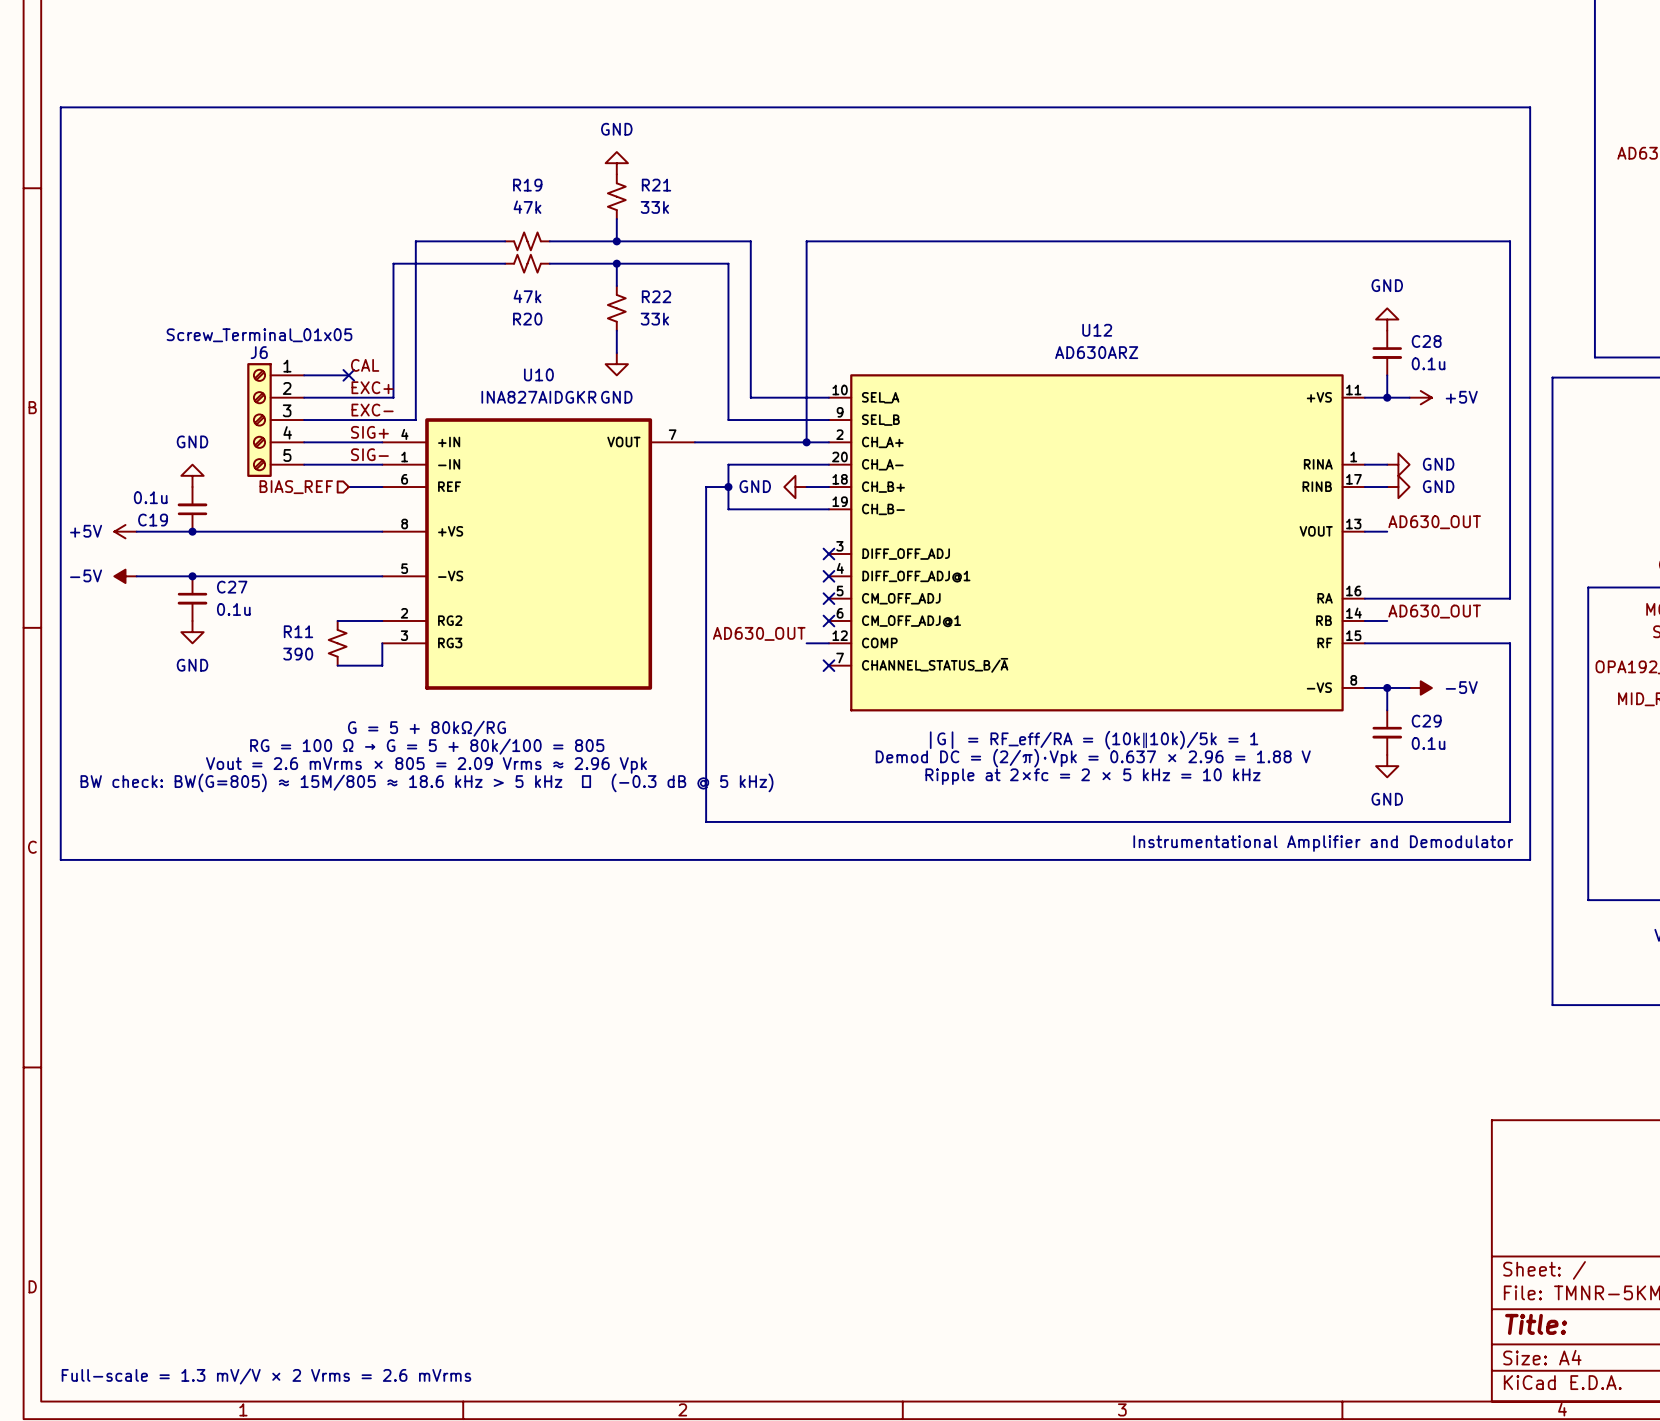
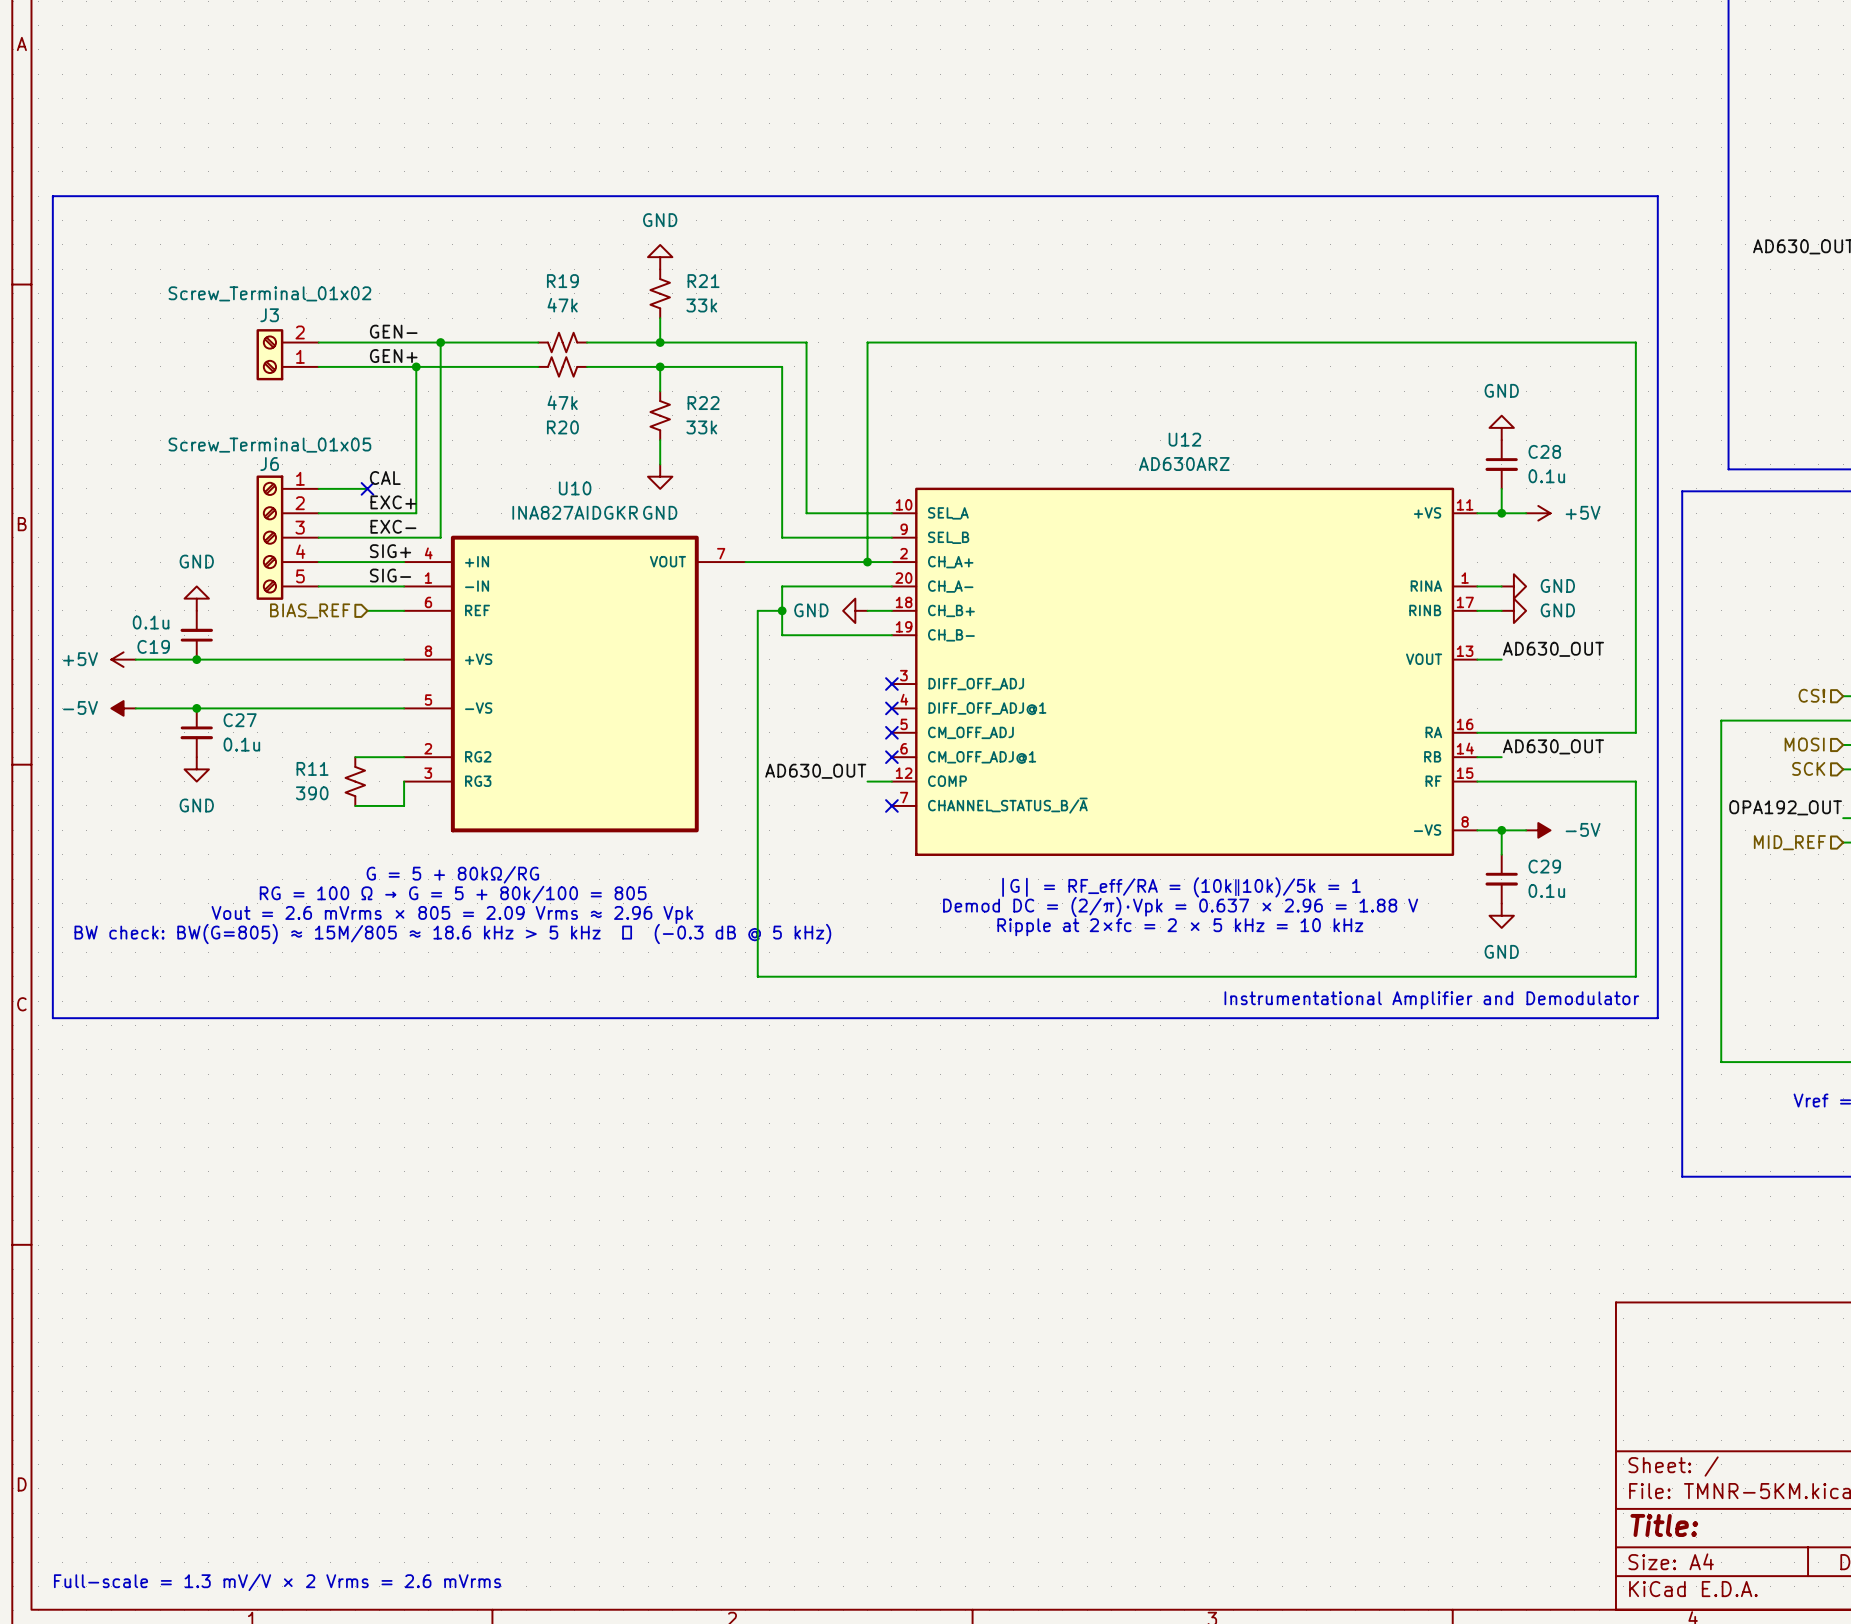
label: none -> GEN- (393, 331)
wire: none -> (318, 342) (440, 342)
junction: none -> (440, 342)
J3: none -> Screw_Terminal_01x02 (287, 354)
label: none -> GEN+ (393, 356)
wire: none -> (318, 366) (416, 366)
junction: none -> (416, 366)

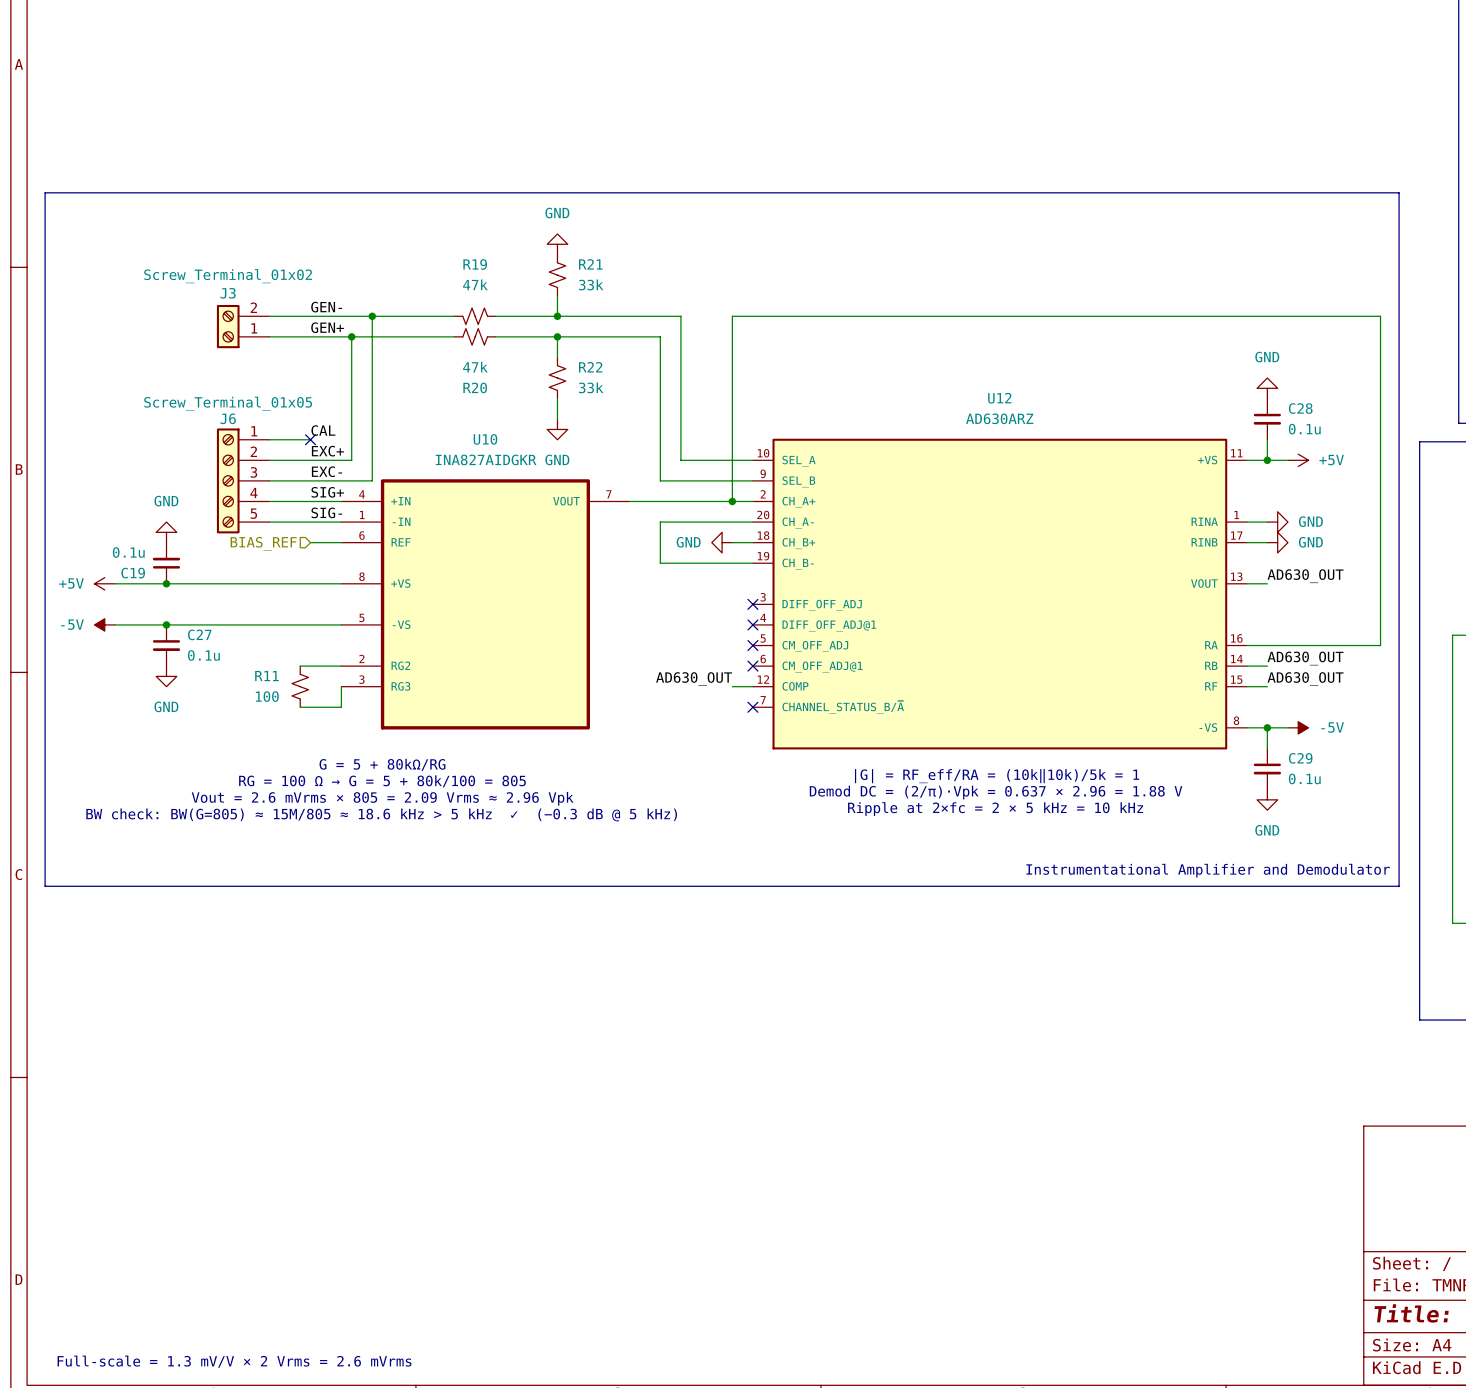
wire: (782, 610) (757, 610) (757, 976) (1635, 976) (1635, 781) (1501, 781) -> none
junction: (782, 610) -> none
label: none -> AD630_OUT (1305, 679)
R11 value: 390 (312, 793) -> 100 (267, 696)

